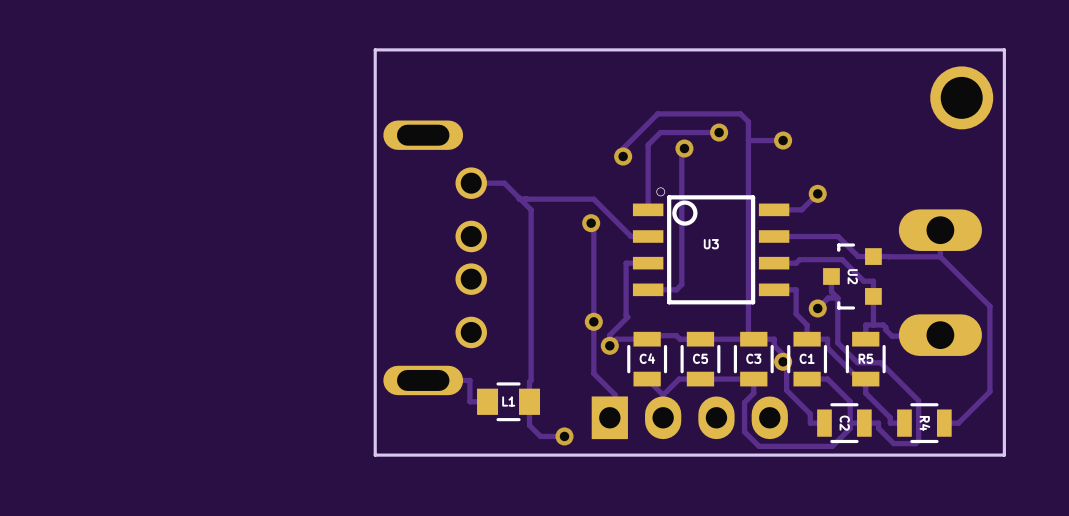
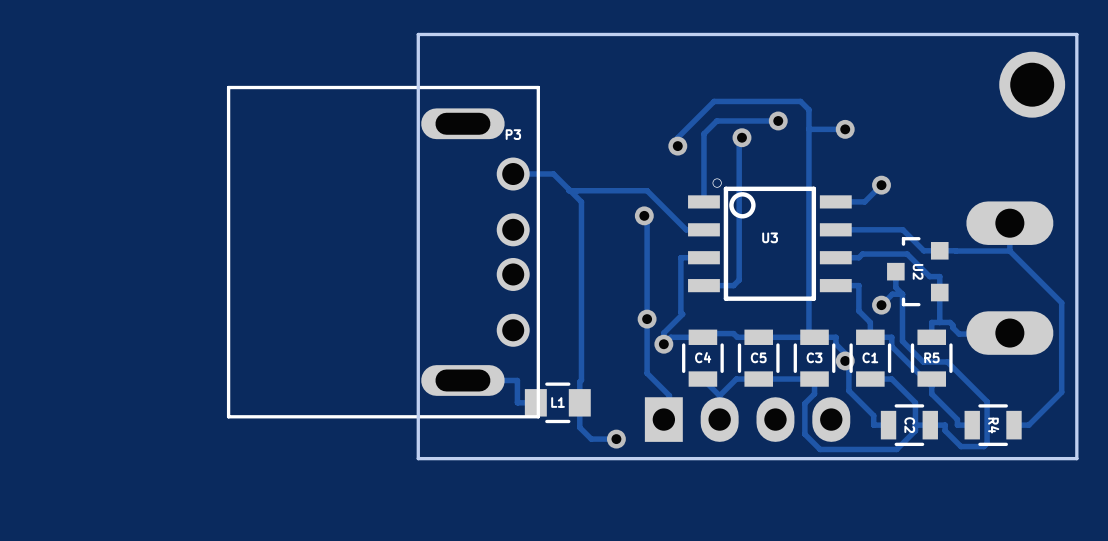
P3 side: top (435, 257) -> bottom (383, 252)

